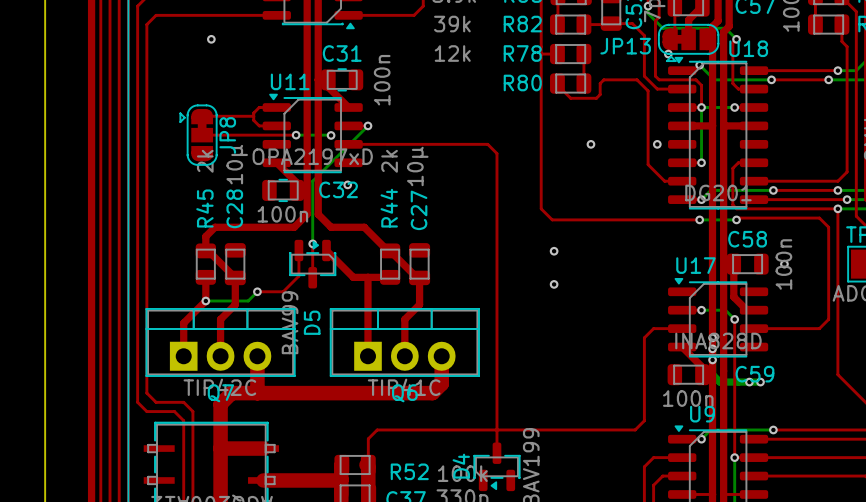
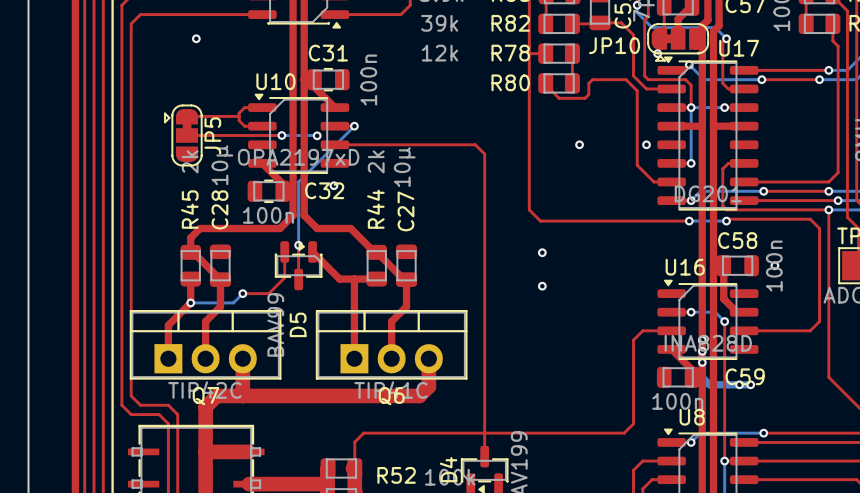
JP13 name: JP13 (625, 46) -> JP10 (614, 45)
U18 name: U18 (748, 48) -> U17 (739, 48)
U11 name: U11 (290, 81) -> U10 (275, 81)
JP8 name: JP8 (227, 135) -> JP5 (212, 135)
U17 name: U17 (695, 265) -> U16 (685, 267)
U9 name: U9 (702, 414) -> U8 (692, 417)

